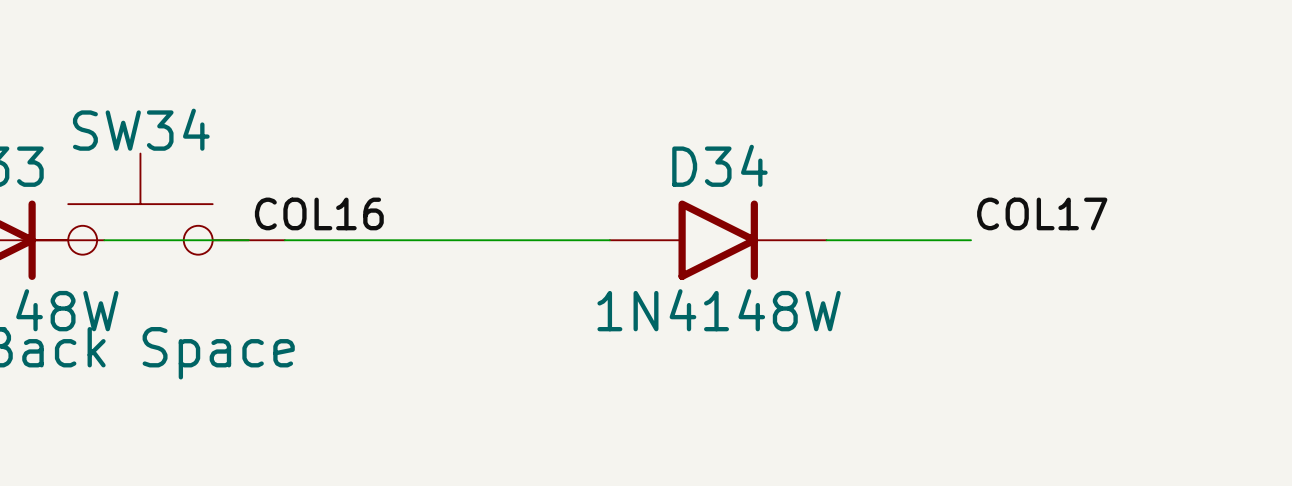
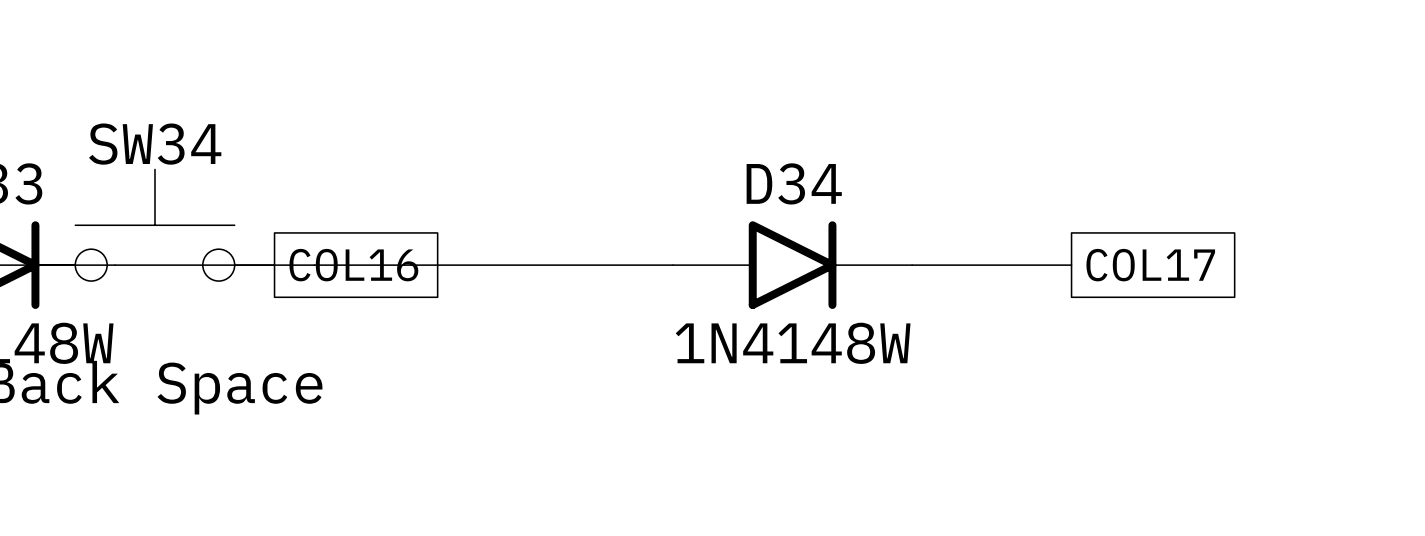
label: COL16 (319, 213) -> none
label: COL17 (1042, 213) -> none
global label: none -> COL16 (353, 265)
global label: none -> COL17 (1150, 265)

